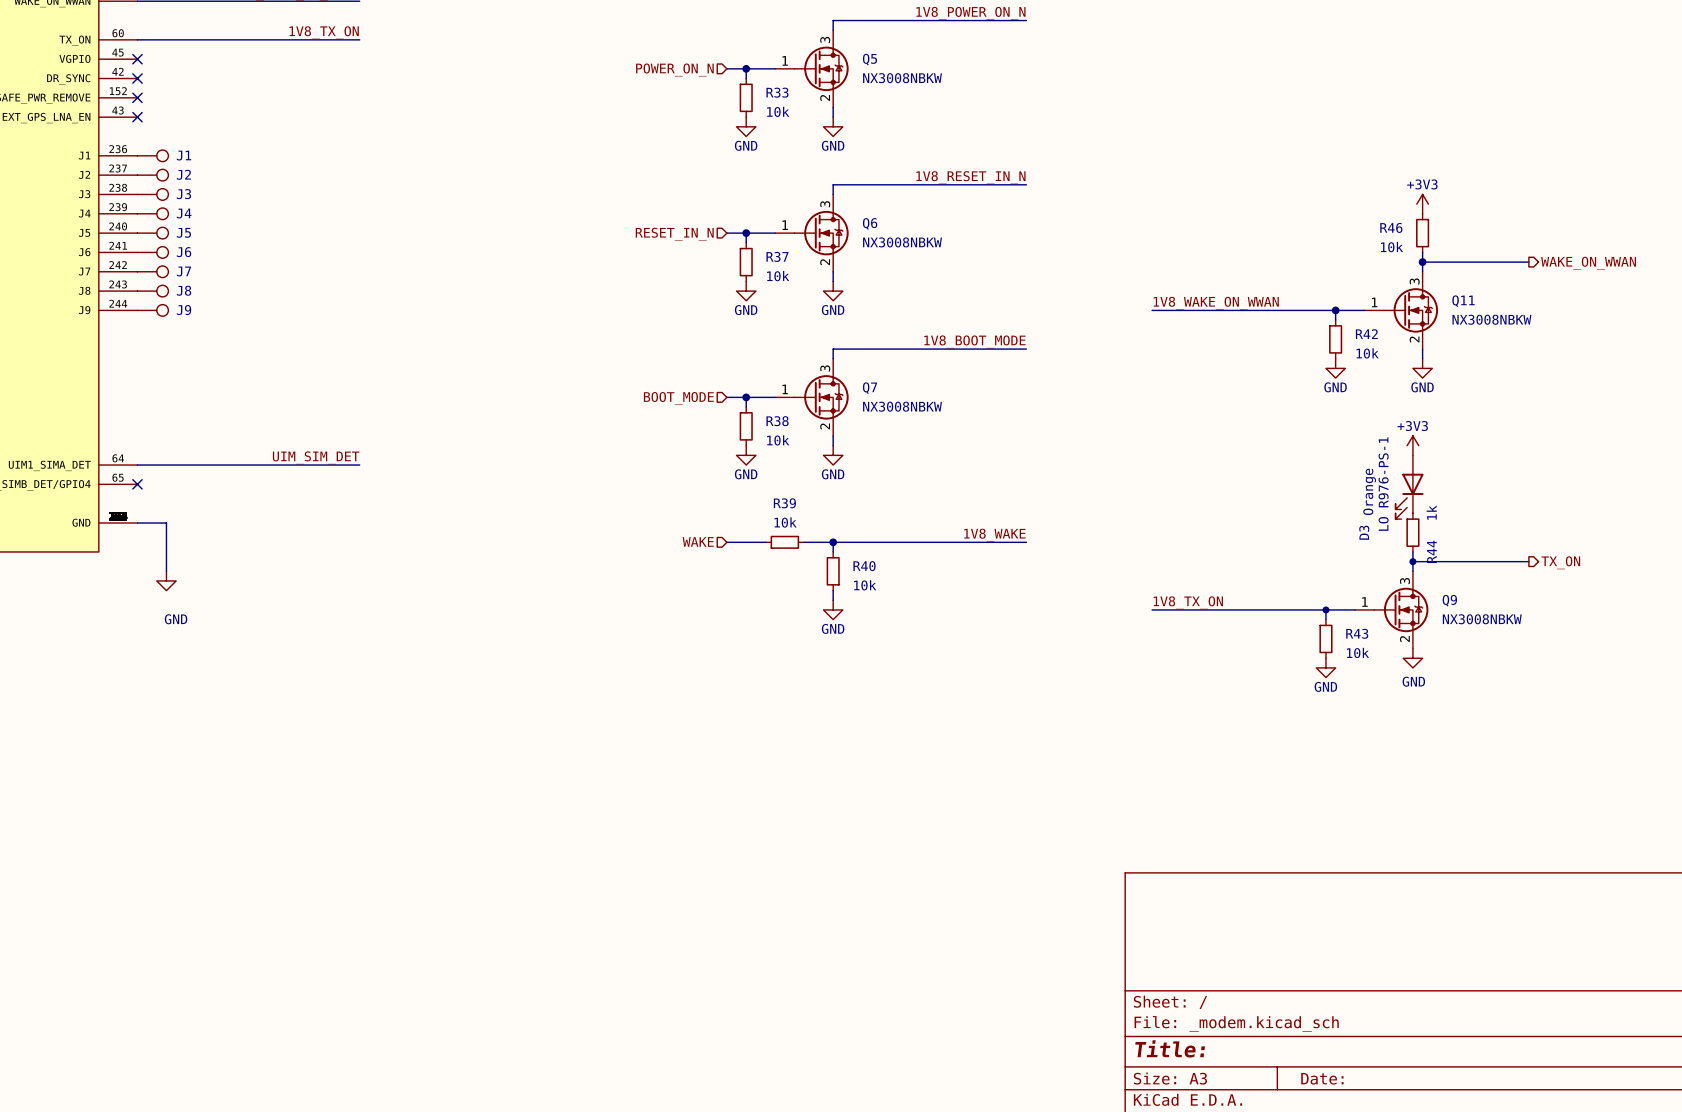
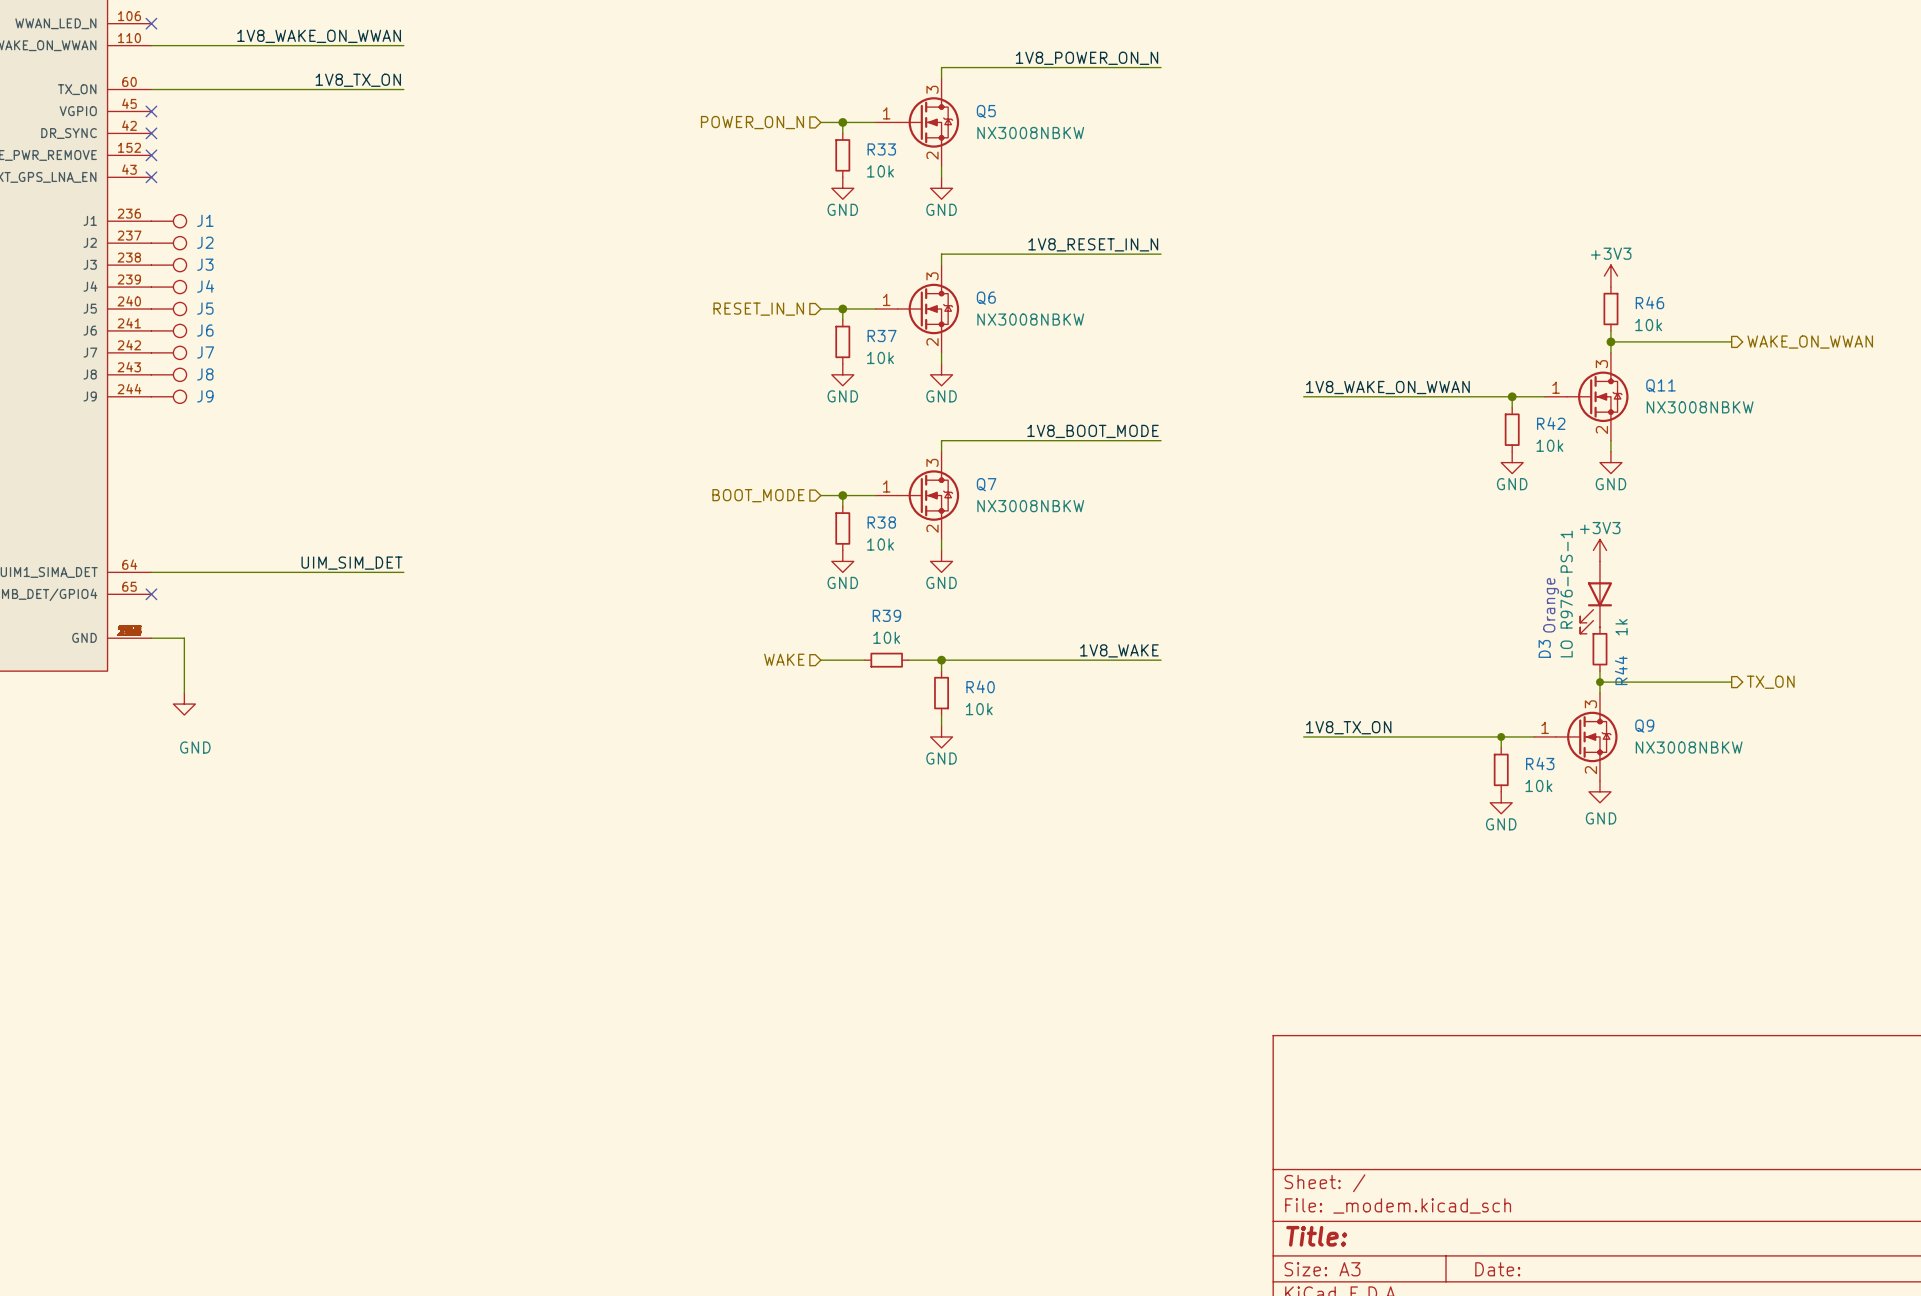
R46 name position: R46 (1391, 227) -> R46 (1649, 302)
R46 value position: 10k (1392, 247) -> 10k (1648, 325)

